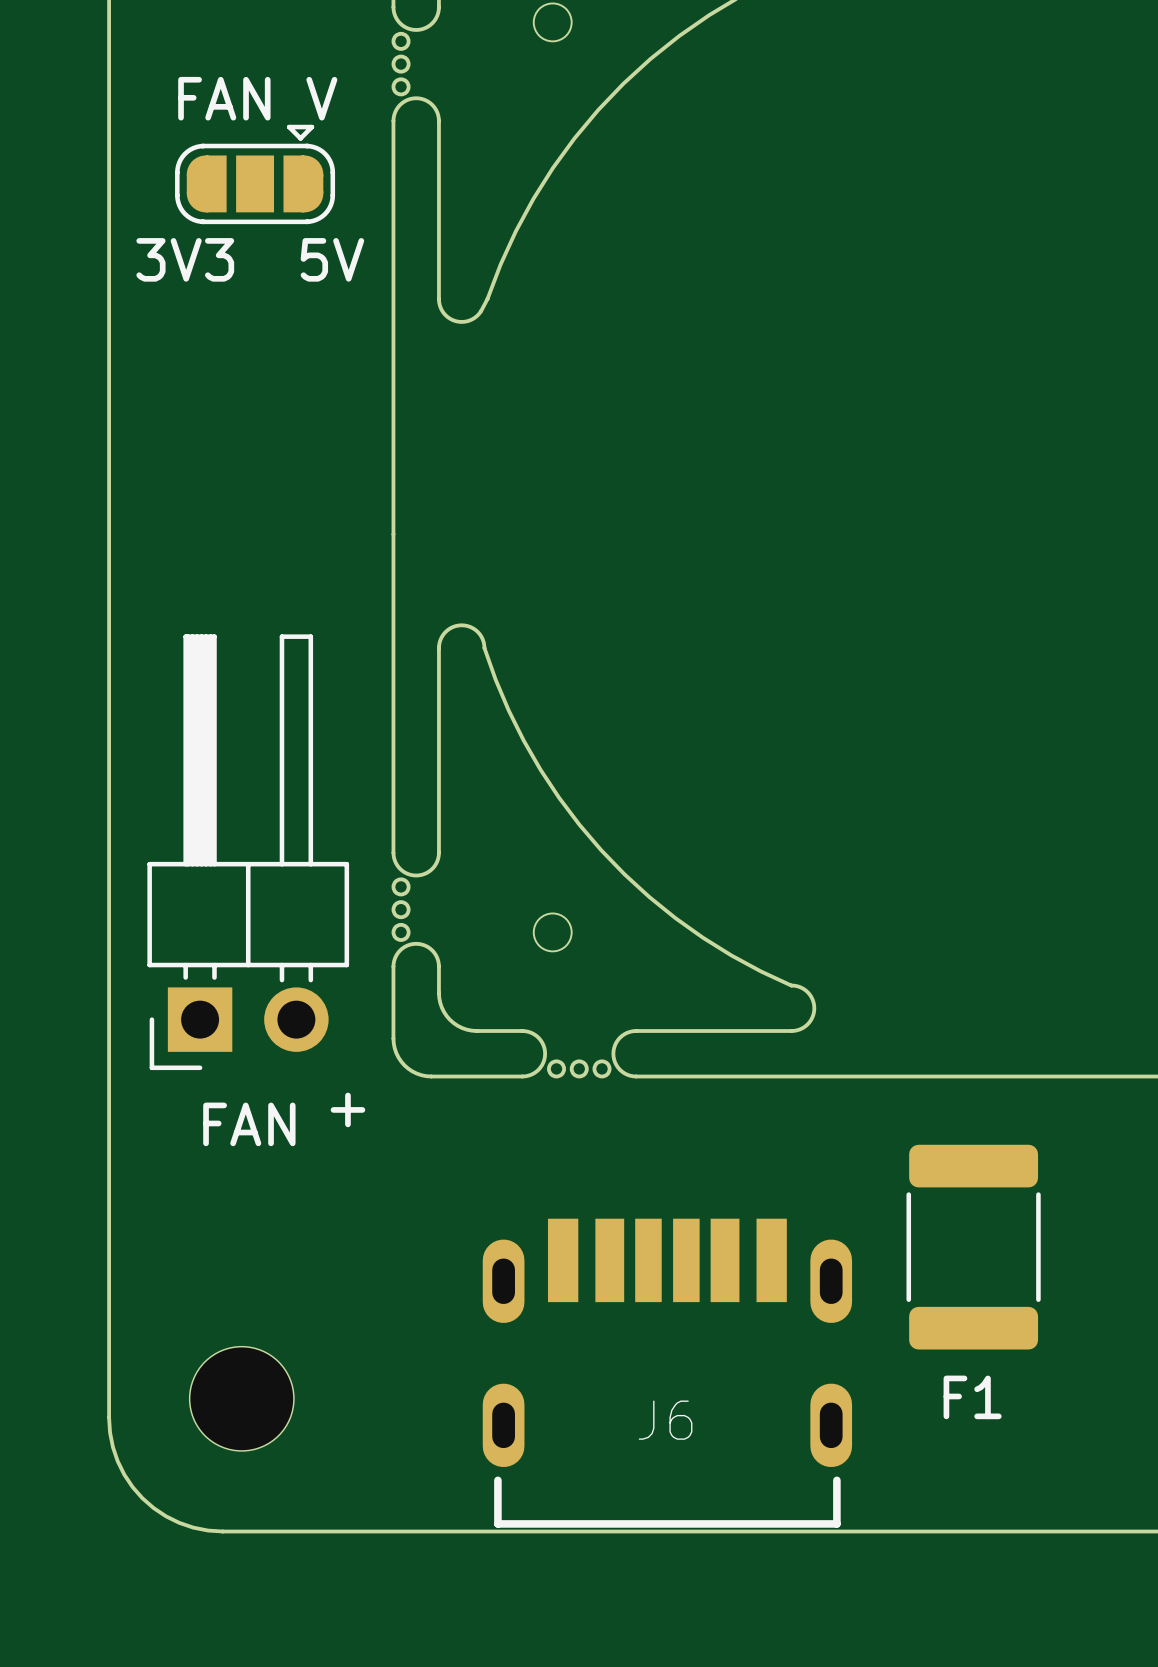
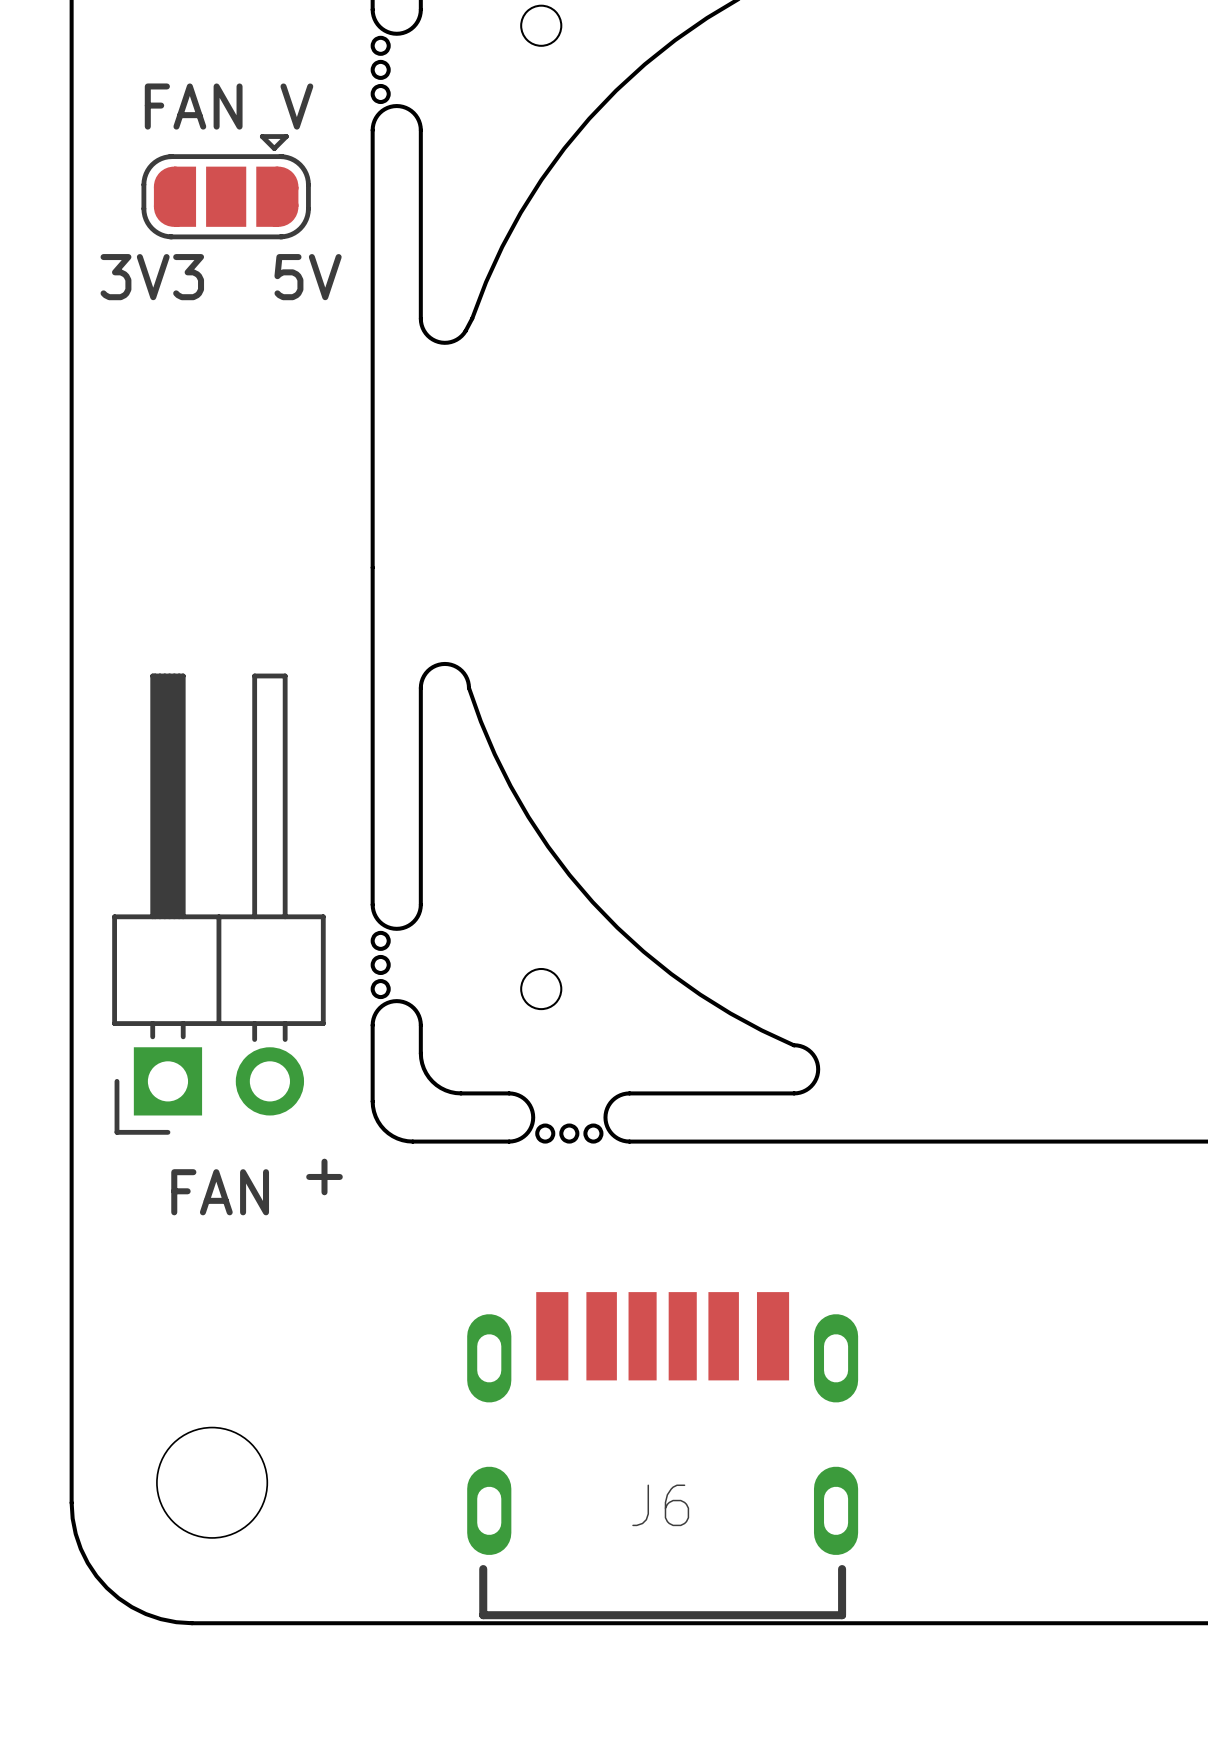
F1: (973, 1247) -> none

